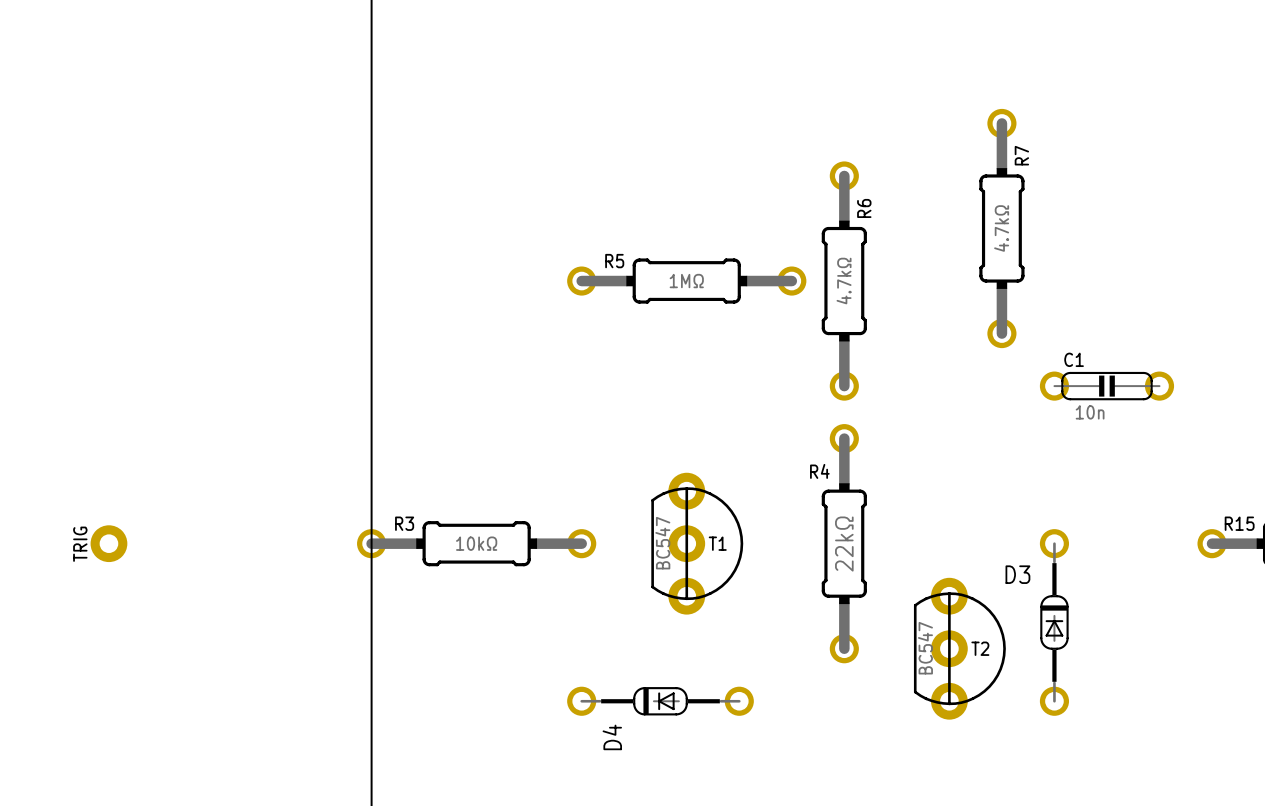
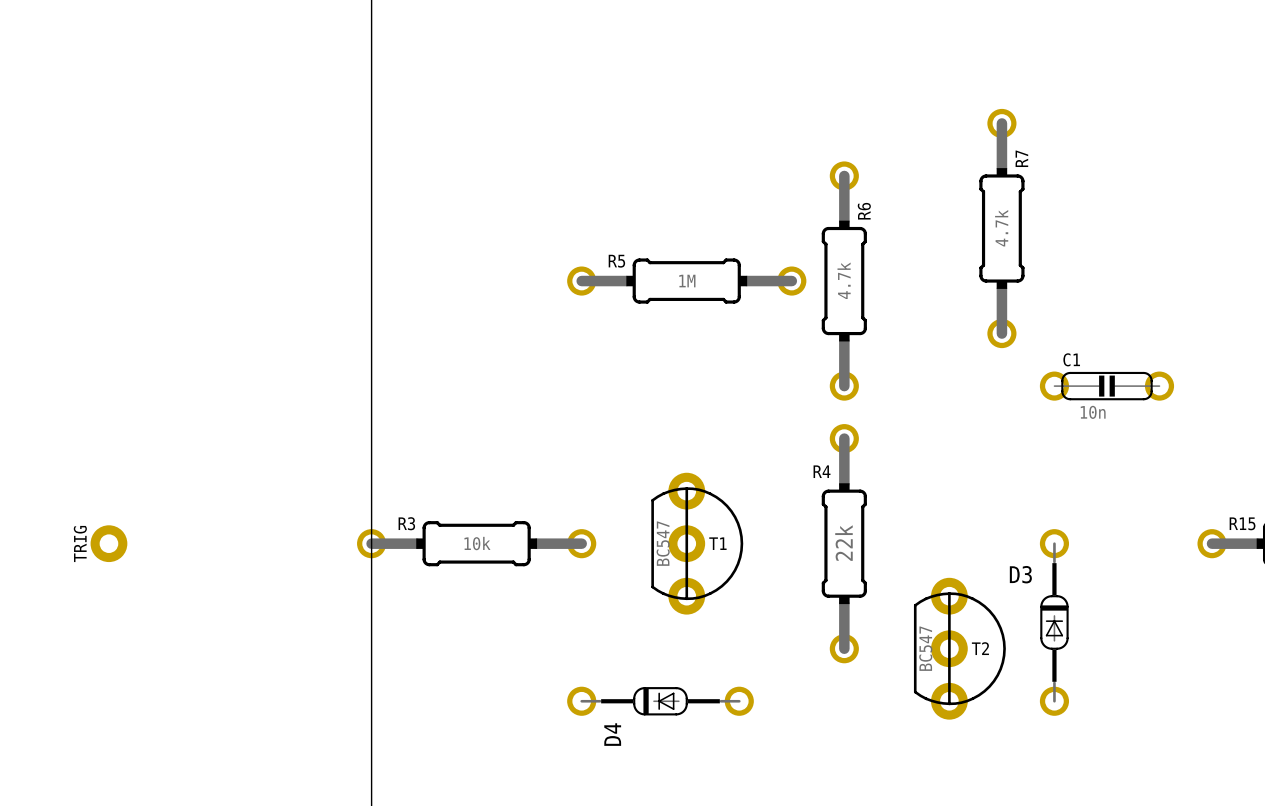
R7 value: 4.7kΩ (1001, 228) -> 4.7k (1001, 228)
R5 value: 1MΩ (686, 281) -> 1M (687, 281)
R6 value: 4.7kΩ (844, 281) -> 4.7k (844, 280)
R3 value: 10kΩ (476, 543) -> 10k (477, 543)
R4 value: 22kΩ (844, 544) -> 22k (843, 543)

